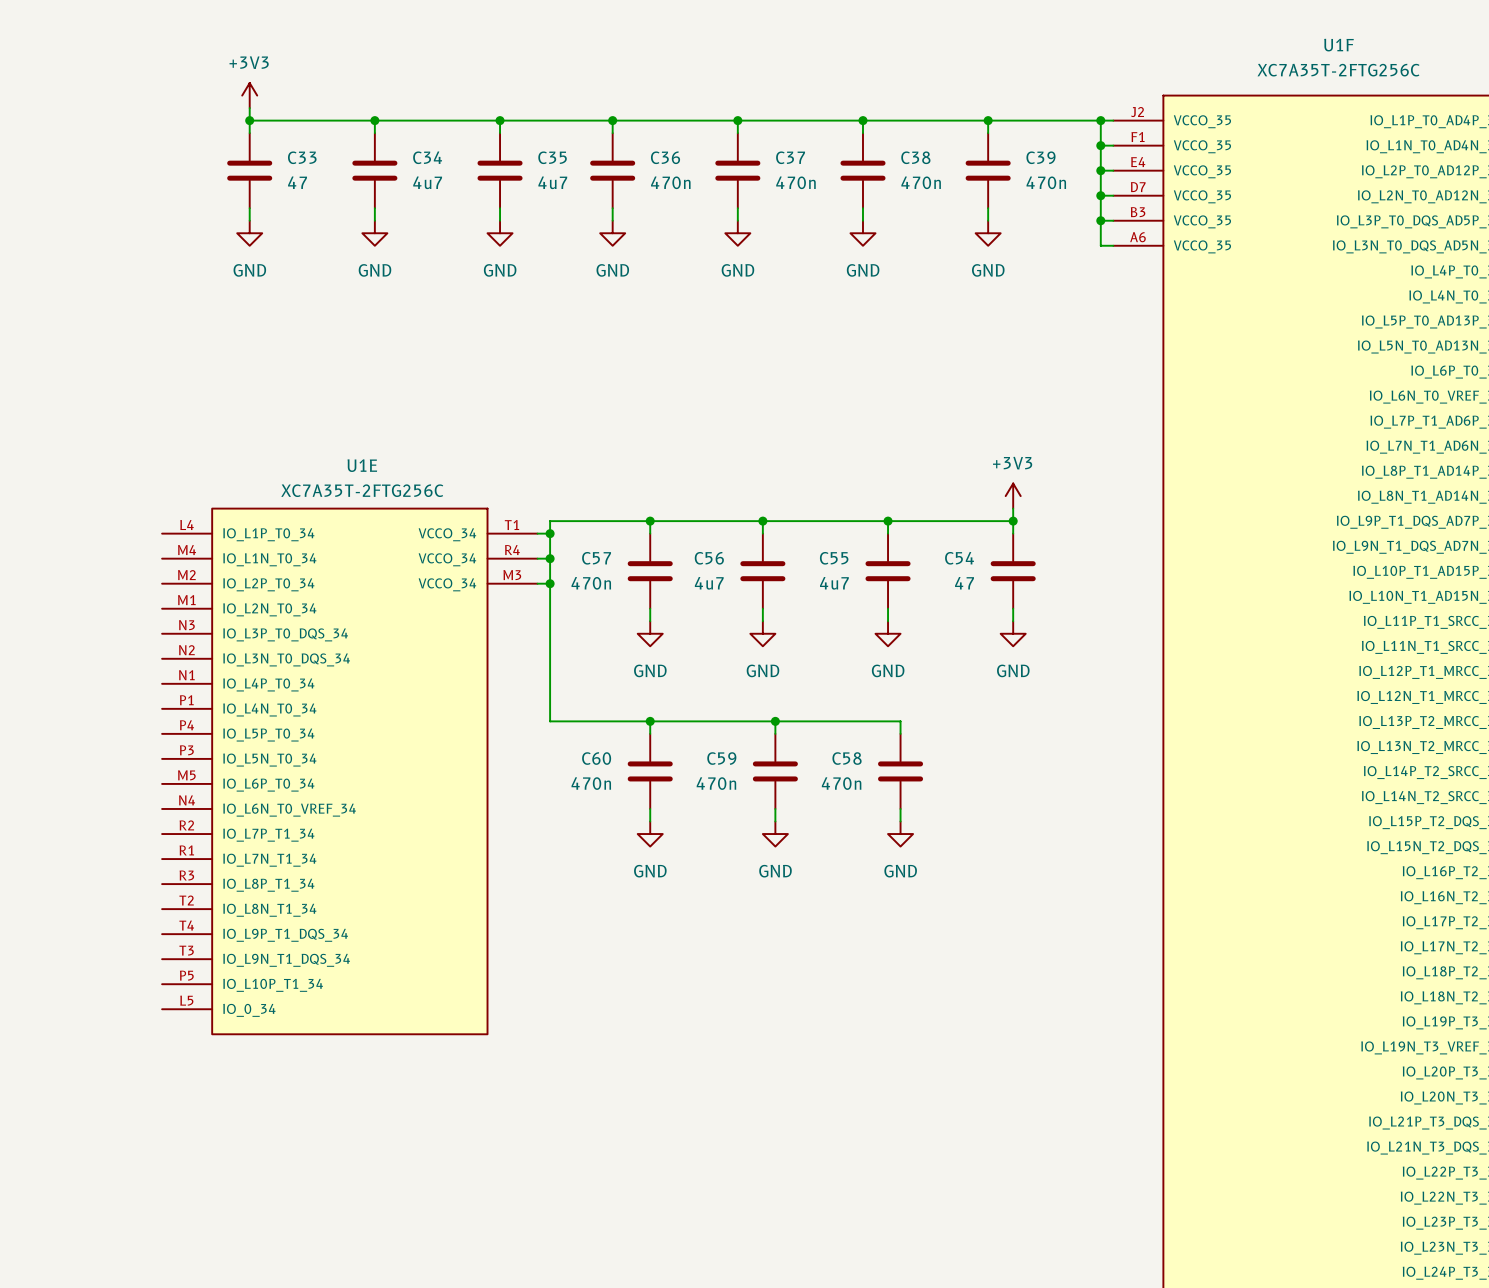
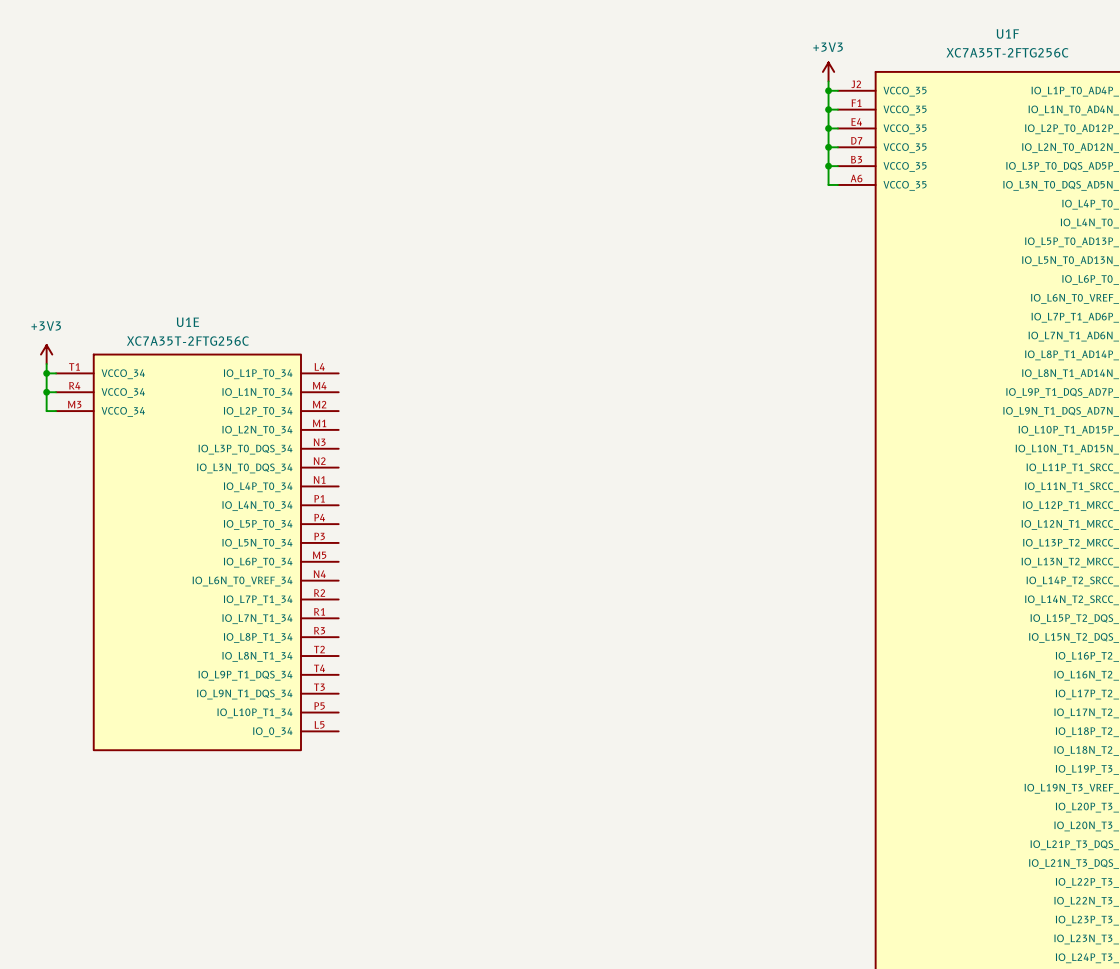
power symbol: +3V3 (249, 95) -> none
power symbol: none -> +3V3 (828, 71)
wire: (249, 108) (249, 133) -> none
wire: (249, 120) (1100, 120) -> (828, 81) (828, 90)
junction: (249, 120) -> none
wire: (374, 120) (374, 133) -> none
junction: (374, 120) -> none
wire: (500, 120) (500, 133) -> none
junction: (500, 120) -> none
wire: (612, 120) (612, 133) -> none
junction: (612, 120) -> none
wire: (737, 120) (737, 133) -> none
junction: (737, 120) -> none
wire: (862, 120) (862, 133) -> none
junction: (862, 120) -> none
wire: (988, 120) (988, 133) -> none
junction: (988, 120) -> none
C33: 47 (249, 170) -> none
C34: 4u7 (374, 170) -> none
C35: 4u7 (500, 170) -> none
C36: 470n (612, 170) -> none
C37: 470n (737, 170) -> none
C38: 470n (862, 170) -> none
C39: 470n (988, 170) -> none
wire: (249, 208) (249, 220) -> none
wire: (374, 208) (374, 220) -> none
wire: (500, 208) (500, 220) -> none
wire: (612, 208) (612, 220) -> none
wire: (737, 208) (737, 220) -> none
wire: (862, 208) (862, 220) -> none
wire: (988, 208) (988, 220) -> none
power symbol: GND (249, 233) -> none
power symbol: GND (374, 233) -> none
power symbol: GND (500, 233) -> none
power symbol: GND (612, 233) -> none
power symbol: GND (737, 233) -> none
power symbol: GND (862, 233) -> none
power symbol: GND (988, 233) -> none
power symbol: none -> +3V3 (46, 354)
wire: none -> (46, 363) (46, 411) (56, 411)
wire: none -> (46, 373) (56, 373)
junction: none -> (46, 373)
power symbol: +3V3 (1013, 496) -> none
wire: (1013, 508) (1013, 533) -> none
wire: none -> (46, 392) (56, 392)
junction: none -> (46, 392)
wire: (650, 521) (650, 533) -> none
junction: (650, 521) -> none
wire: (762, 521) (762, 533) -> none
junction: (762, 521) -> none
wire: (888, 521) (888, 533) -> none
junction: (888, 521) -> none
wire: (1013, 521) (550, 521) (550, 721) (900, 721) (900, 733) -> none
junction: (1013, 521) -> none
wire: (537, 533) (550, 533) -> none
junction: (550, 533) -> none
wire: (537, 558) (550, 558) -> none
junction: (550, 558) -> none
C57: 470n (650, 571) -> none
C56: 4u7 (762, 571) -> none
C55: 4u7 (888, 571) -> none
C54: 47 (1013, 571) -> none
wire: (537, 583) (550, 583) -> none
junction: (550, 583) -> none
wire: (650, 608) (650, 621) -> none
wire: (762, 608) (762, 621) -> none
wire: (888, 608) (888, 621) -> none
wire: (1013, 608) (1013, 621) -> none
power symbol: GND (650, 633) -> none
power symbol: GND (762, 633) -> none
power symbol: GND (888, 633) -> none
power symbol: GND (1013, 633) -> none
wire: (650, 721) (650, 733) -> none
junction: (650, 721) -> none
wire: (775, 721) (775, 733) -> none
junction: (775, 721) -> none
U1E flip: as is (349, 771) -> left-right (197, 552)
C60: 470n (650, 771) -> none
C59: 470n (775, 771) -> none
C58: 470n (900, 771) -> none
wire: (650, 808) (650, 821) -> none
wire: (775, 808) (775, 821) -> none
wire: (900, 808) (900, 821) -> none
power symbol: GND (650, 834) -> none
power symbol: GND (775, 834) -> none
power symbol: GND (900, 834) -> none

